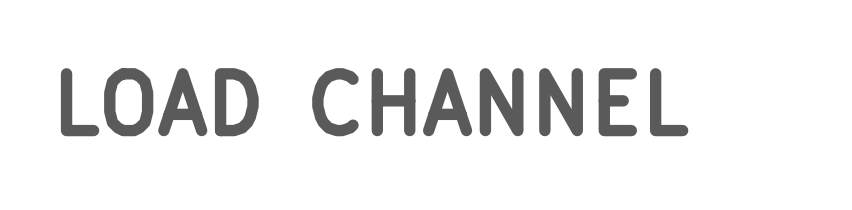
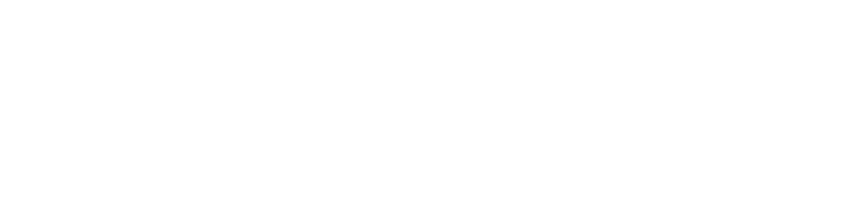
text: LOAD CHANNEL (374, 102) -> none

